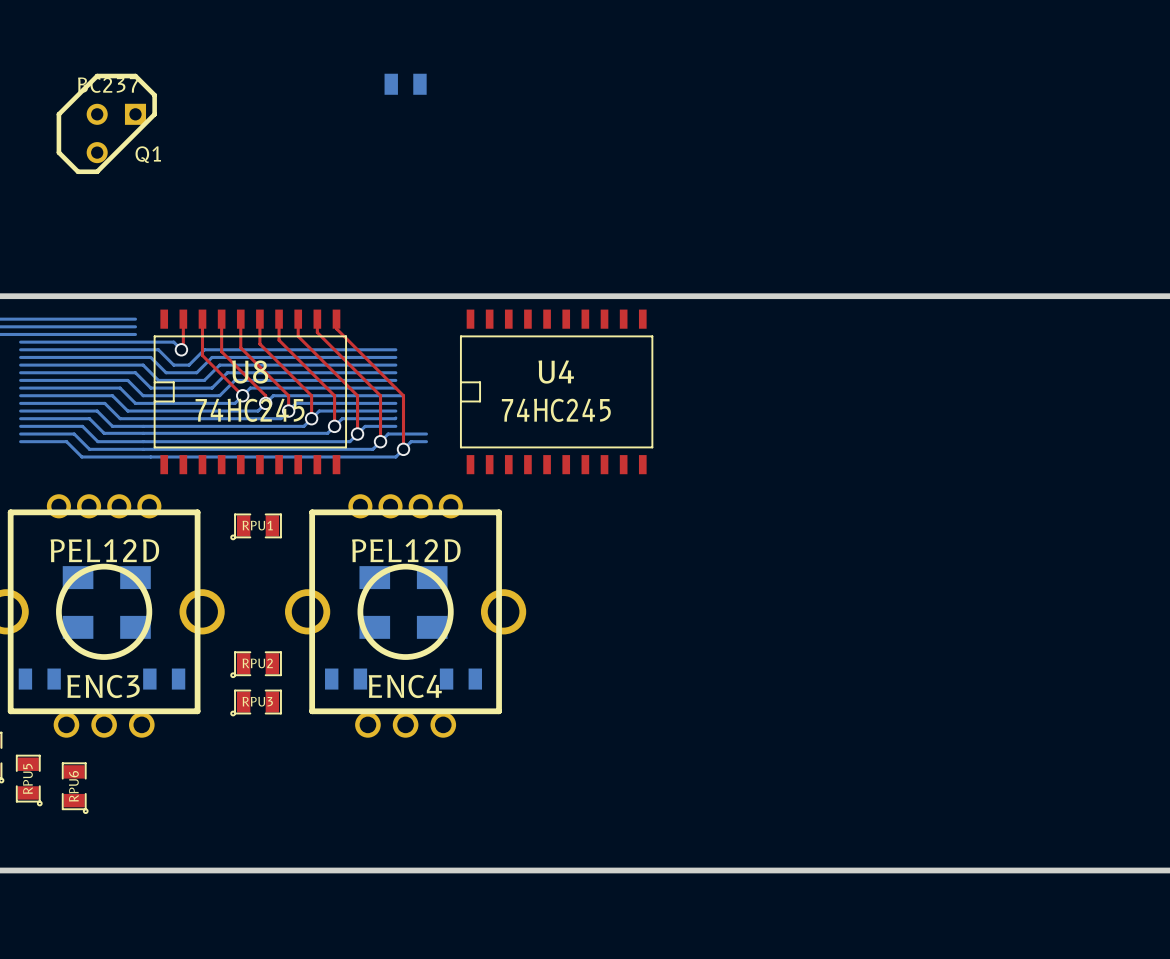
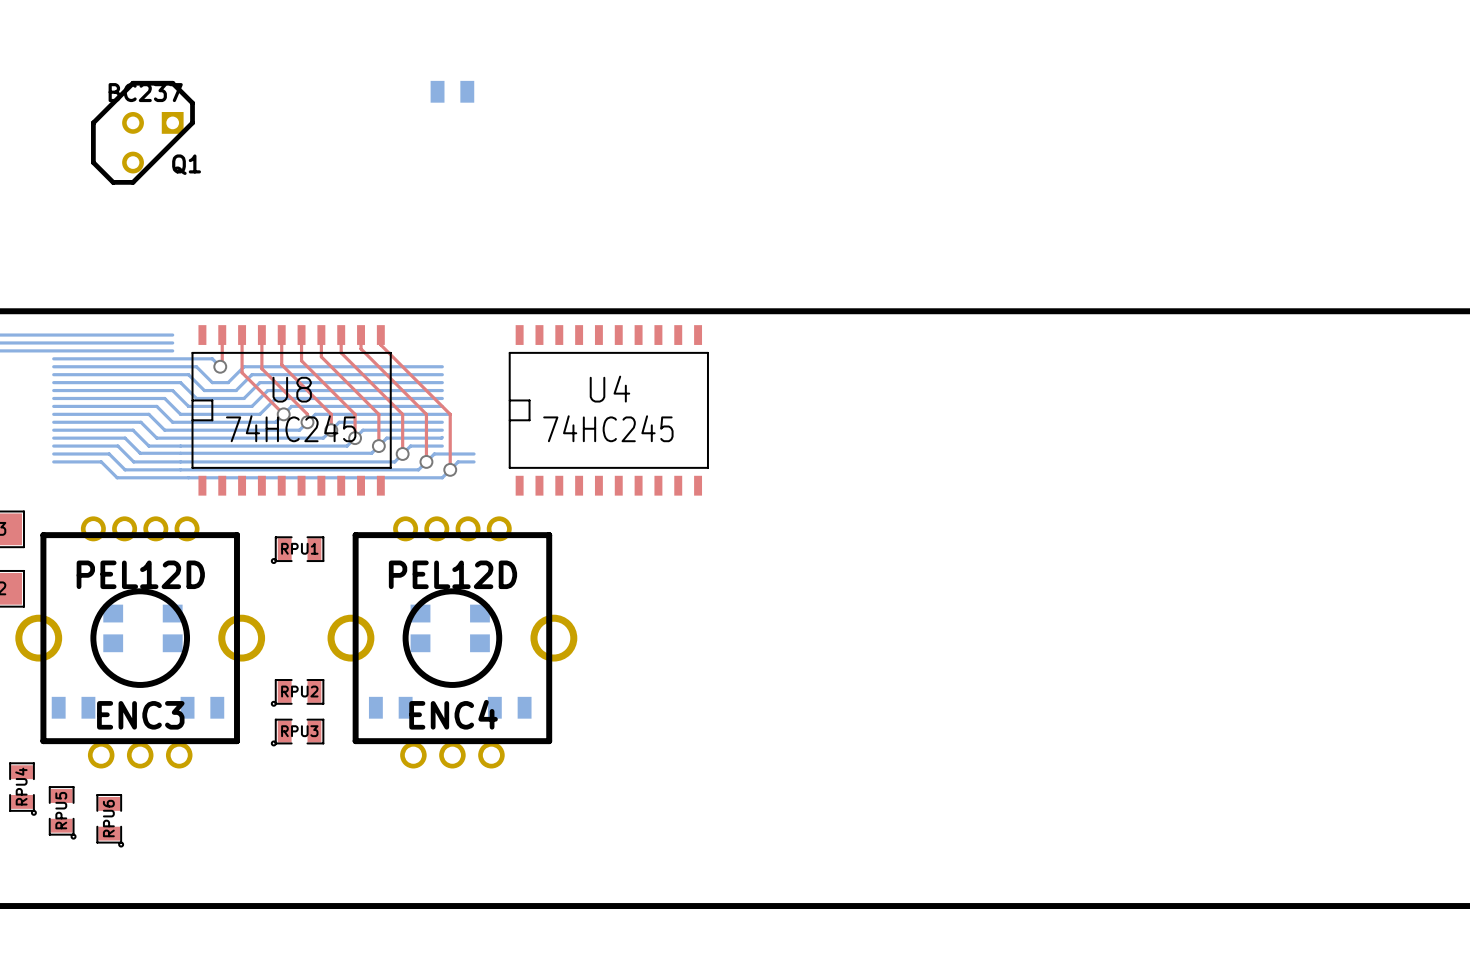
part footprint: [62, 566, 94, 639] -> [103, 604, 124, 653]
part footprint: [120, 566, 151, 639] -> [162, 604, 183, 653]
part footprint: [359, 566, 391, 639] -> [410, 604, 431, 653]
part footprint: [416, 566, 448, 639] -> [470, 604, 490, 653]

